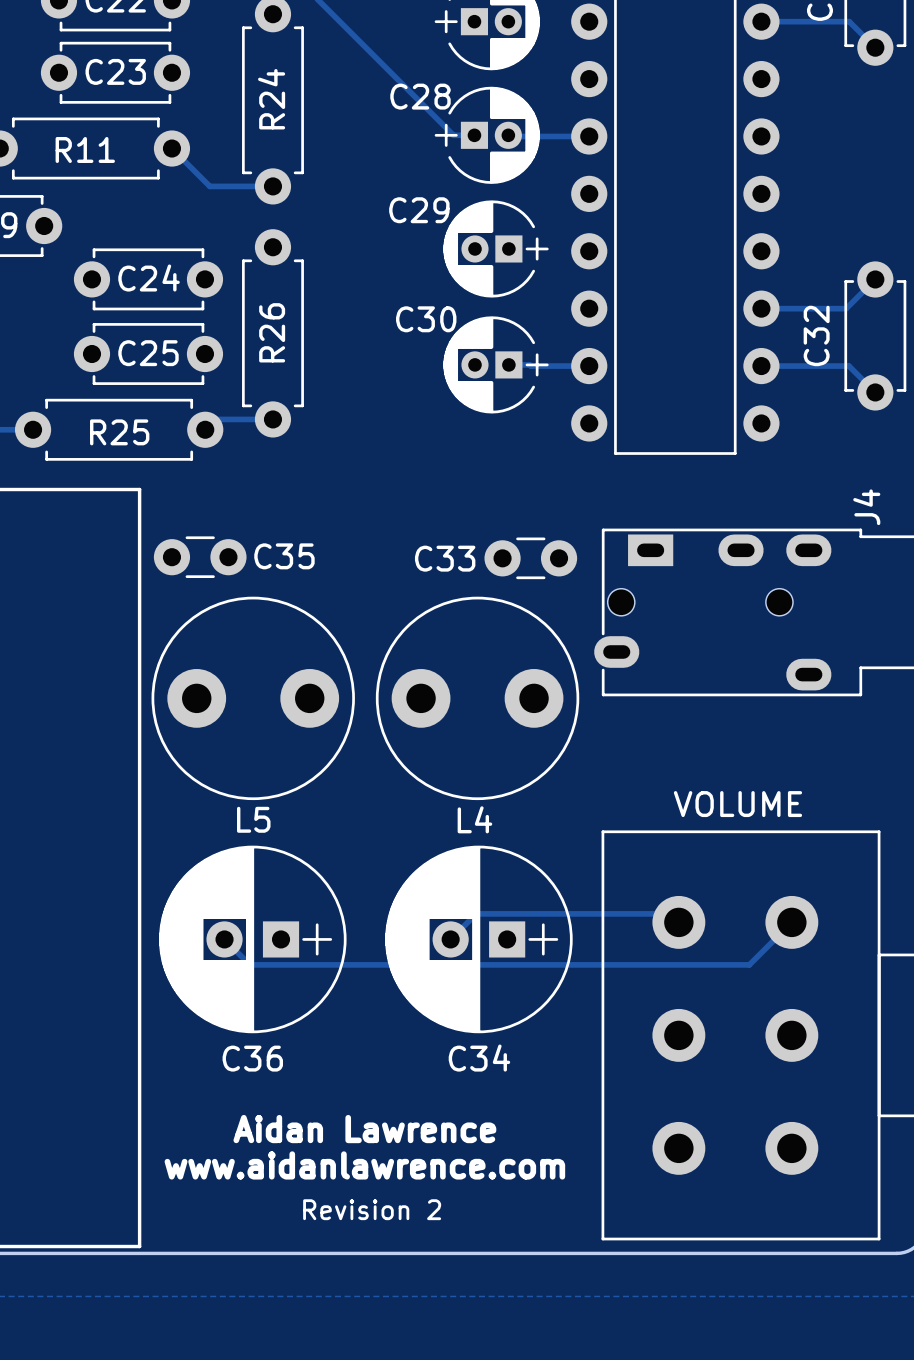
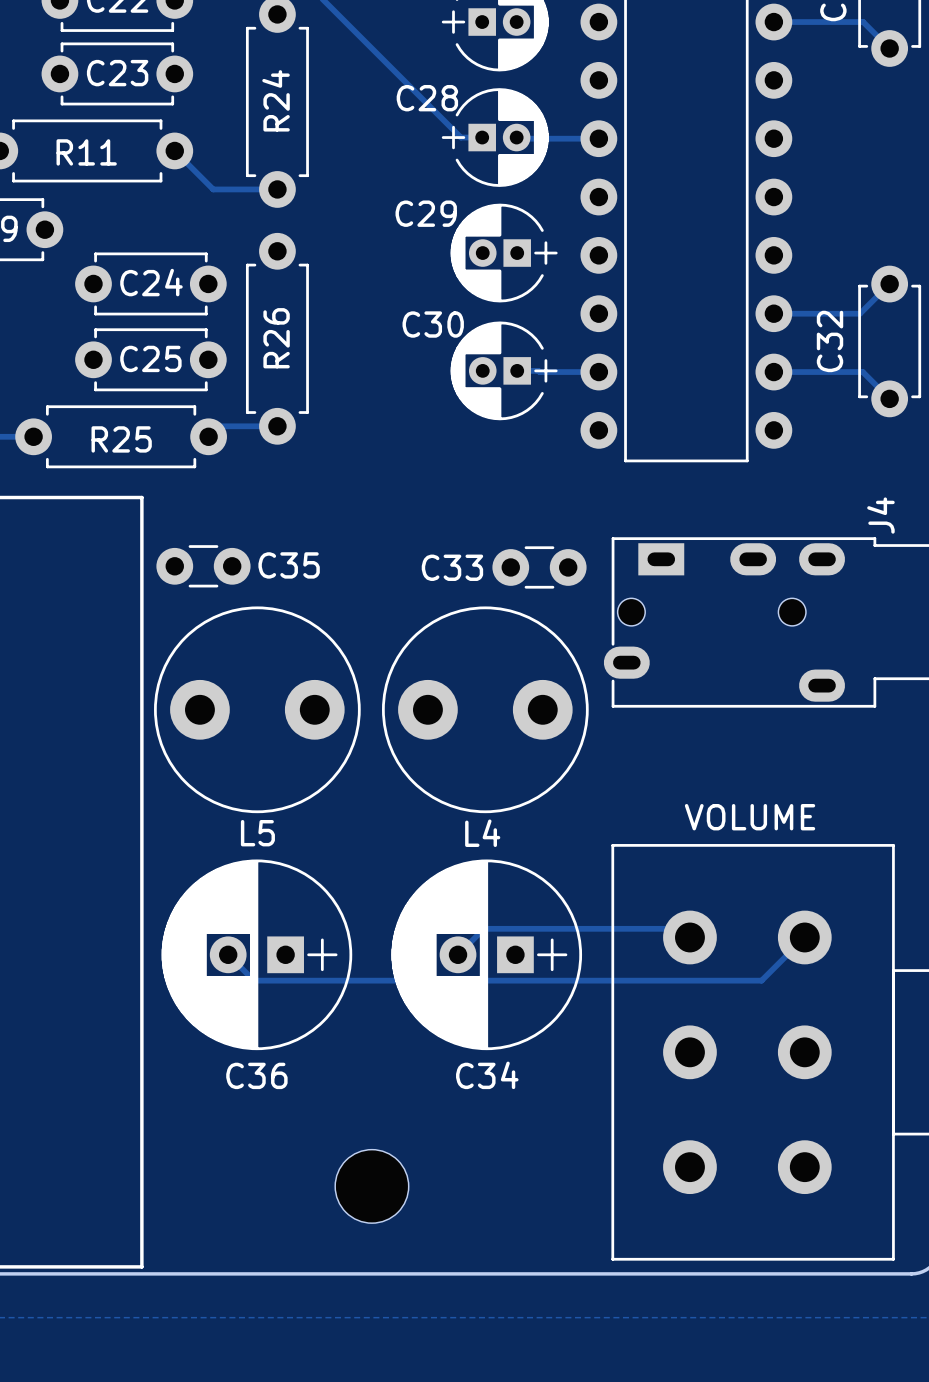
text: Aidan Lawrence (364, 1129) -> none
text: www.aidanlawrence.com (364, 1165) -> none
part: none -> (371, 1186)
text: Revision 2 (372, 1209) -> none

